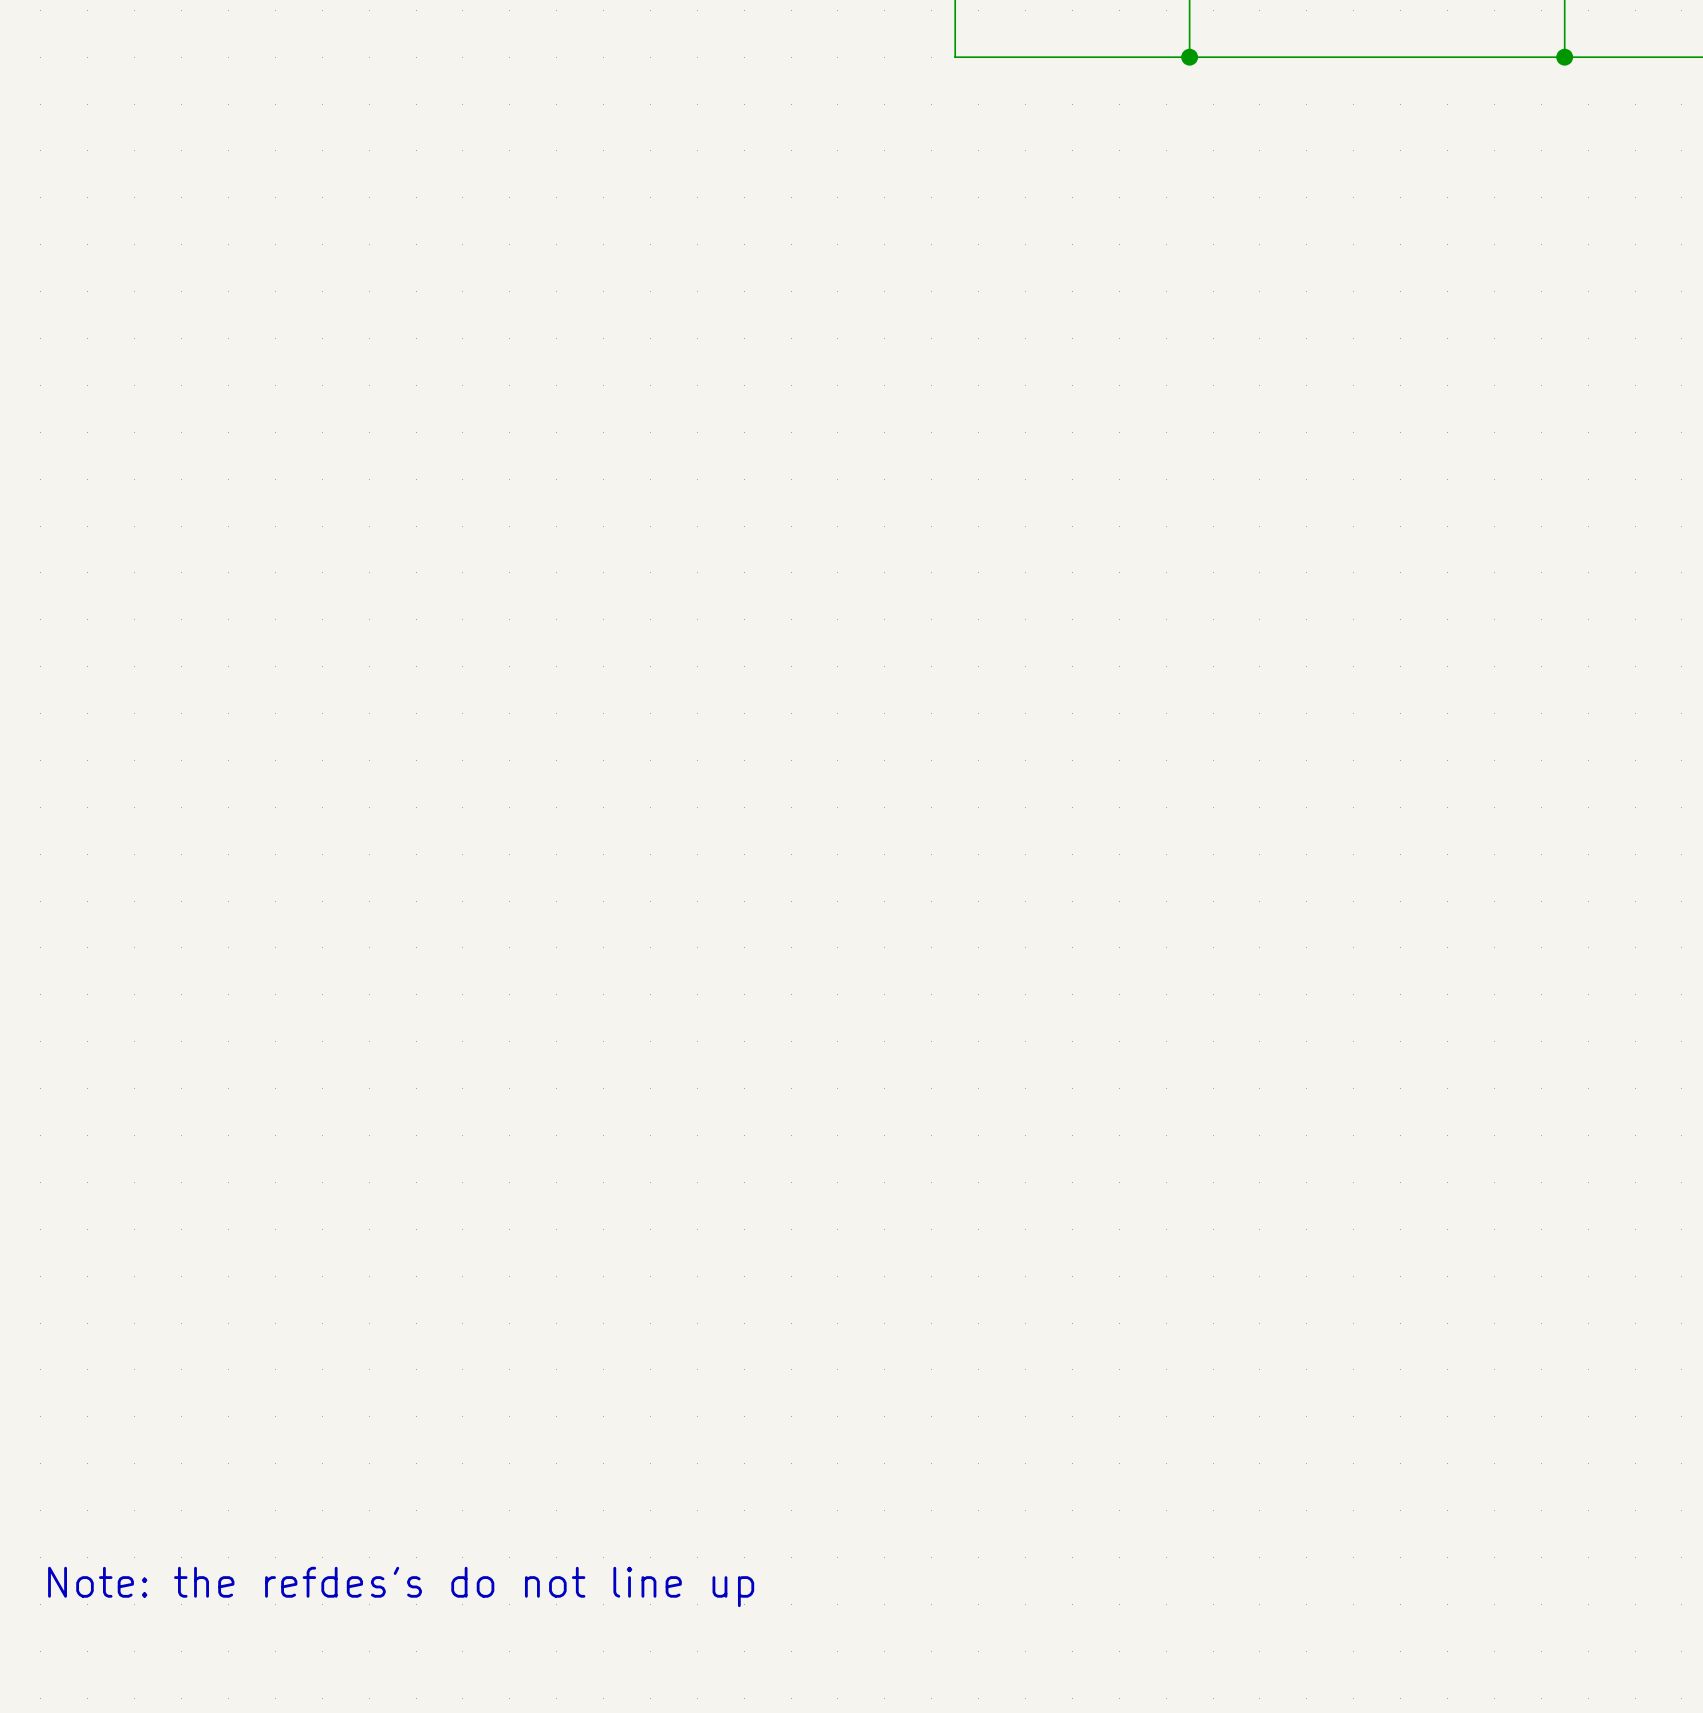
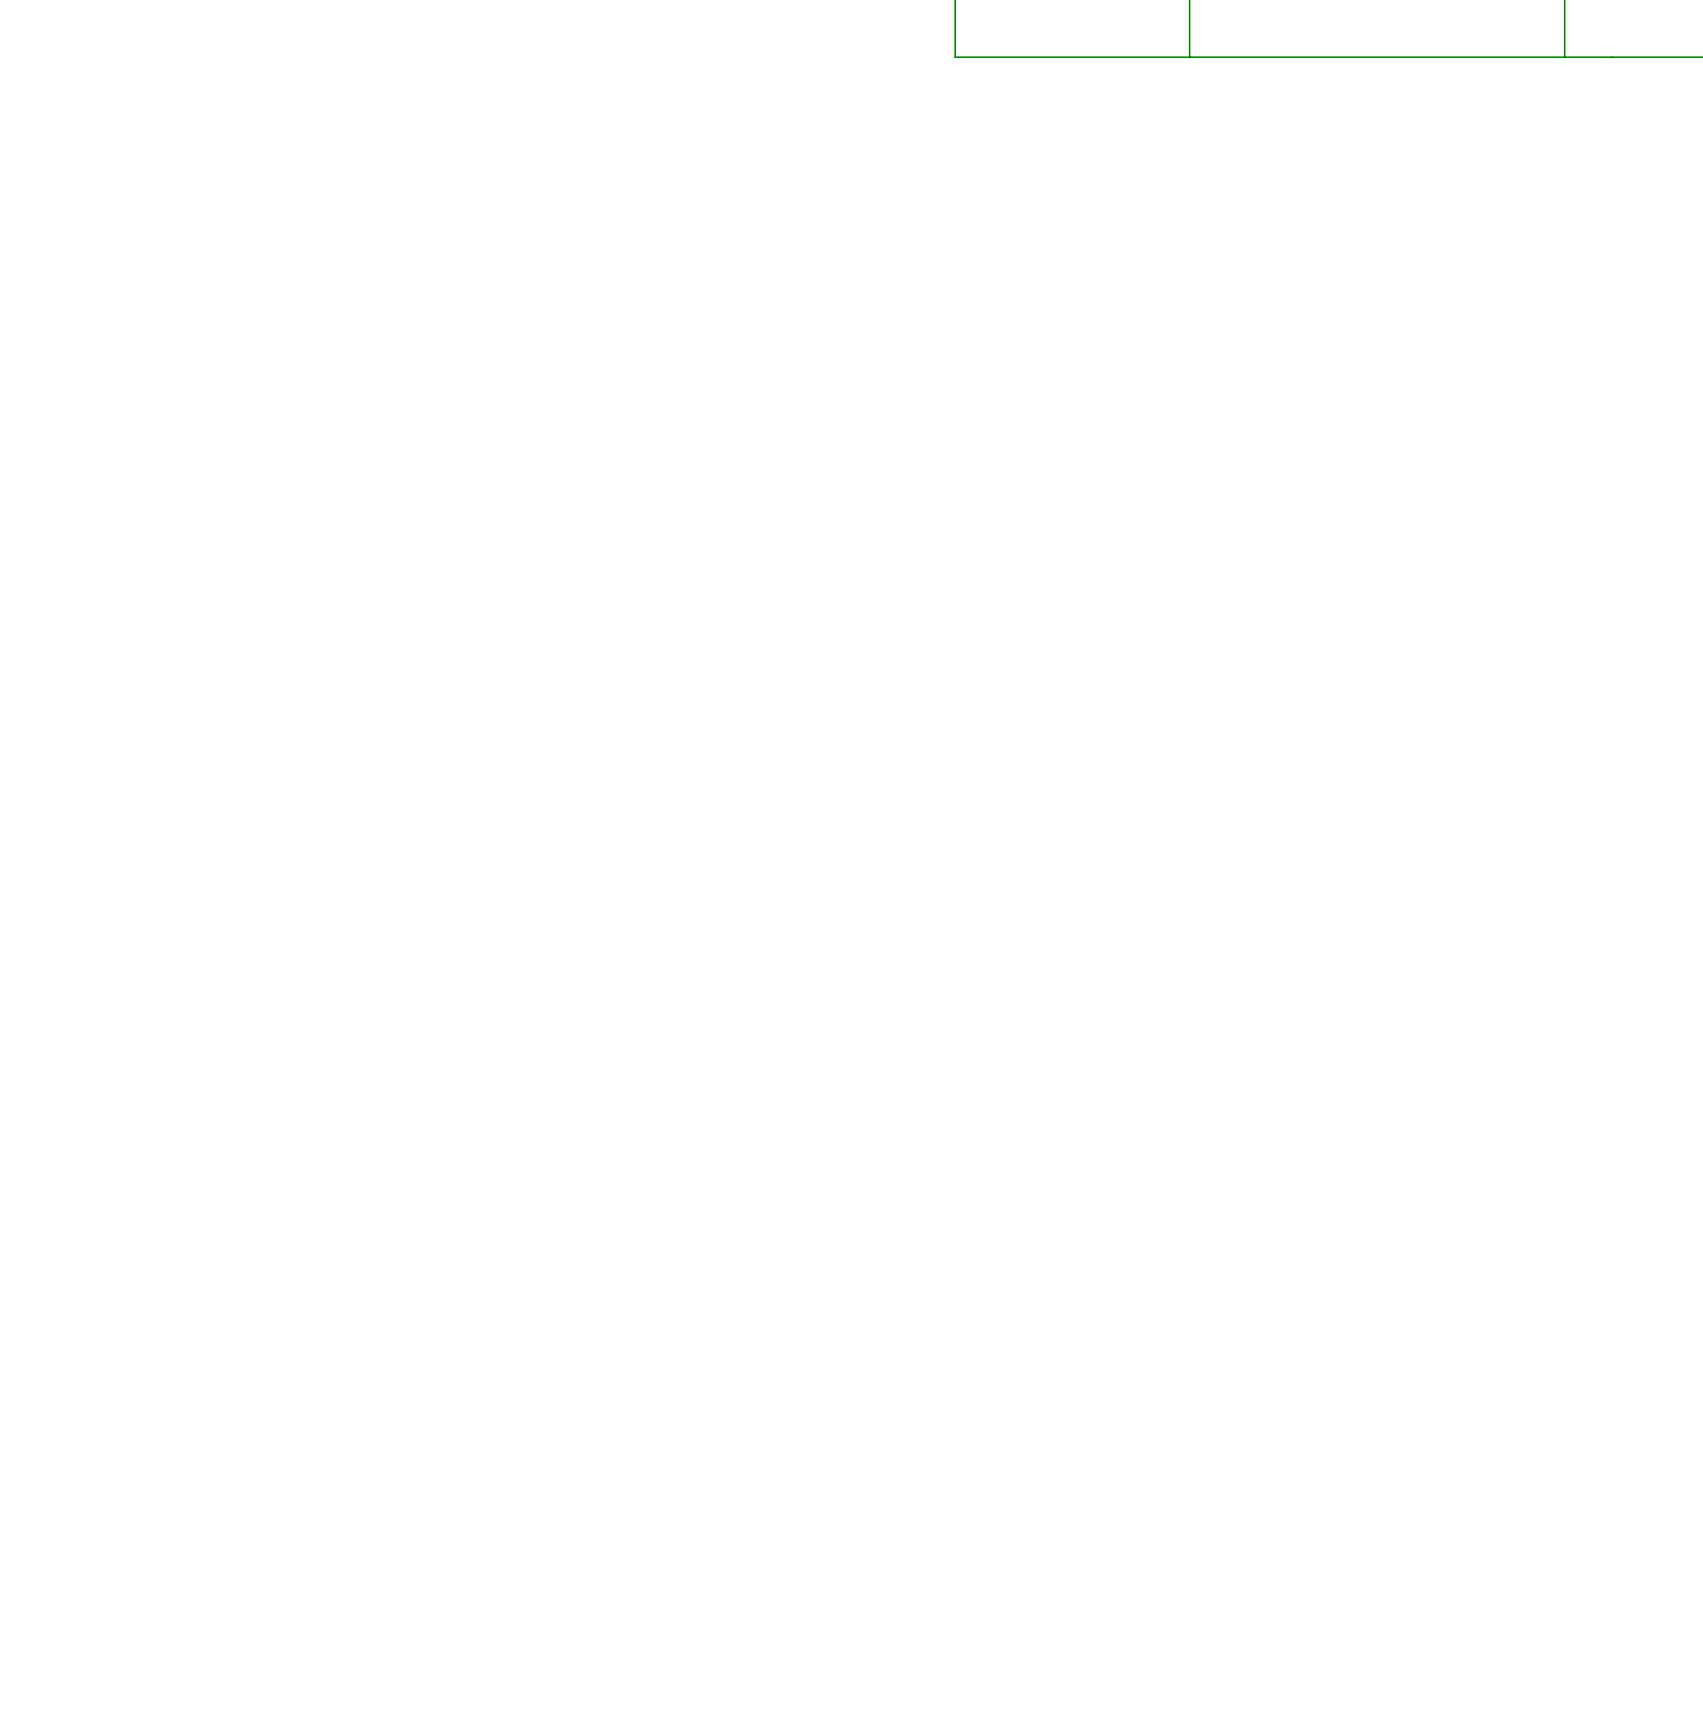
junction: (1189, 57) -> none
junction: (1564, 57) -> none
text: Note: the refdes's do not line up (401, 1586) -> none

